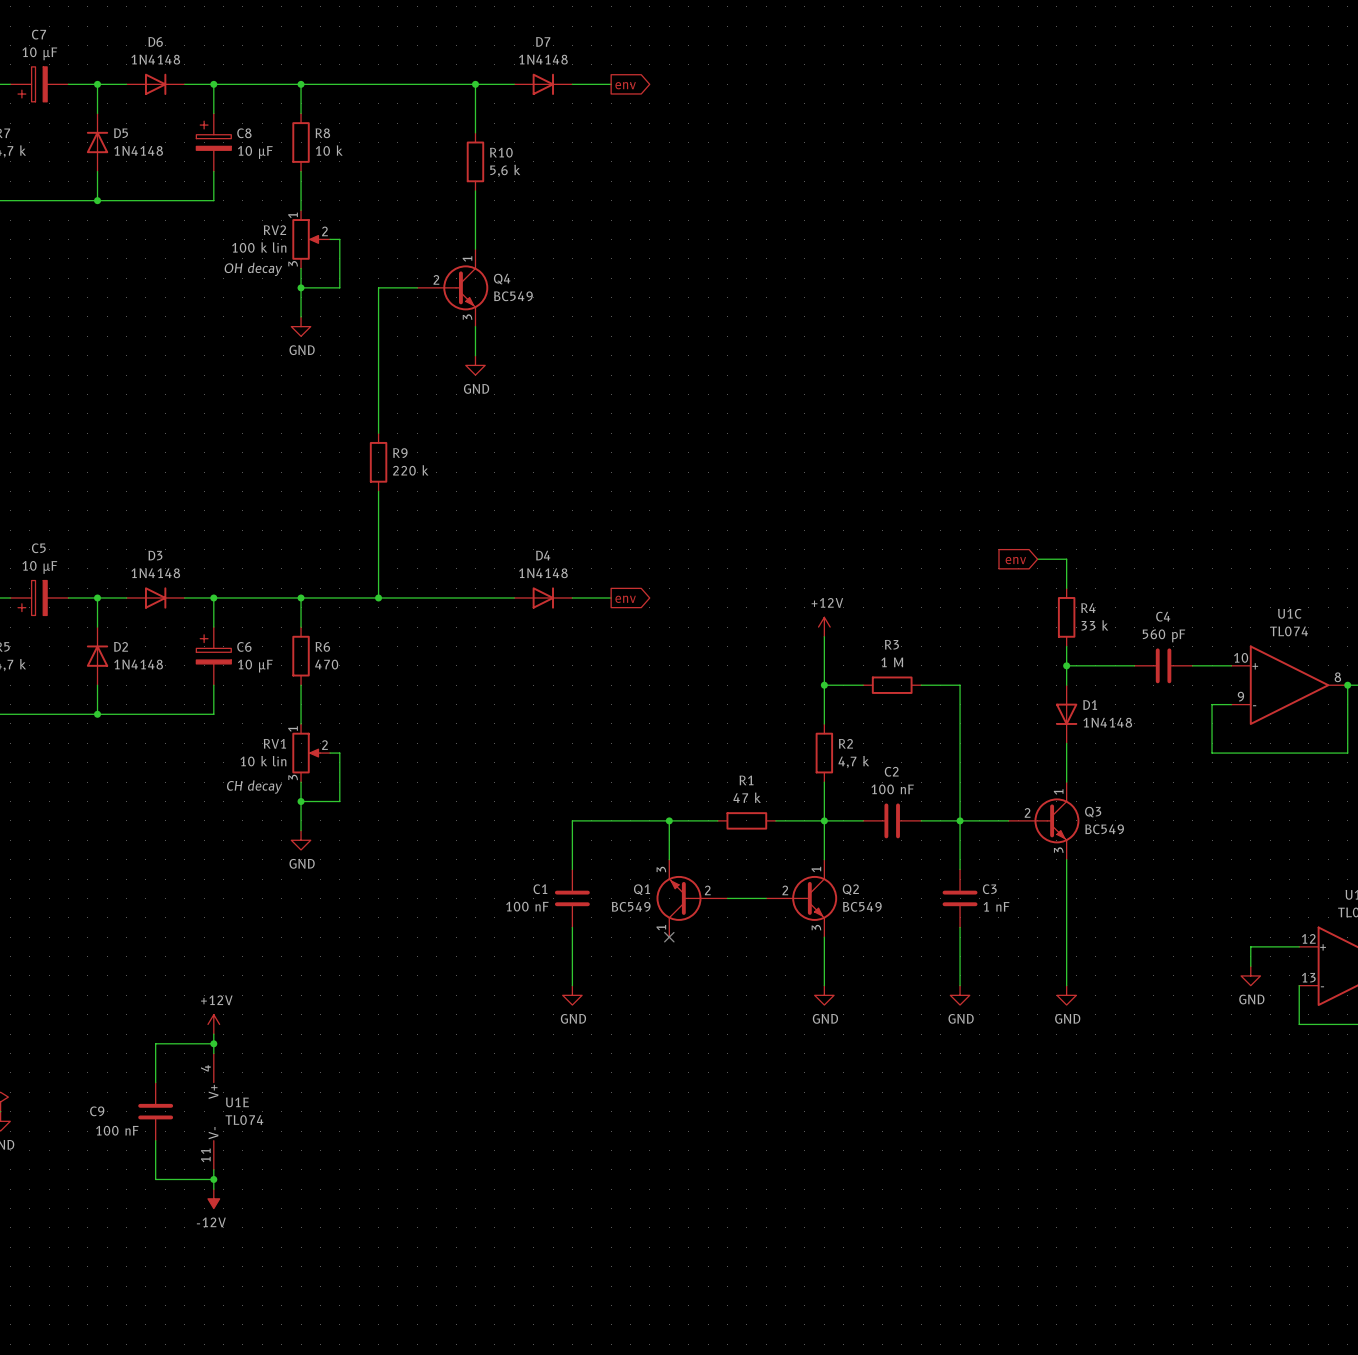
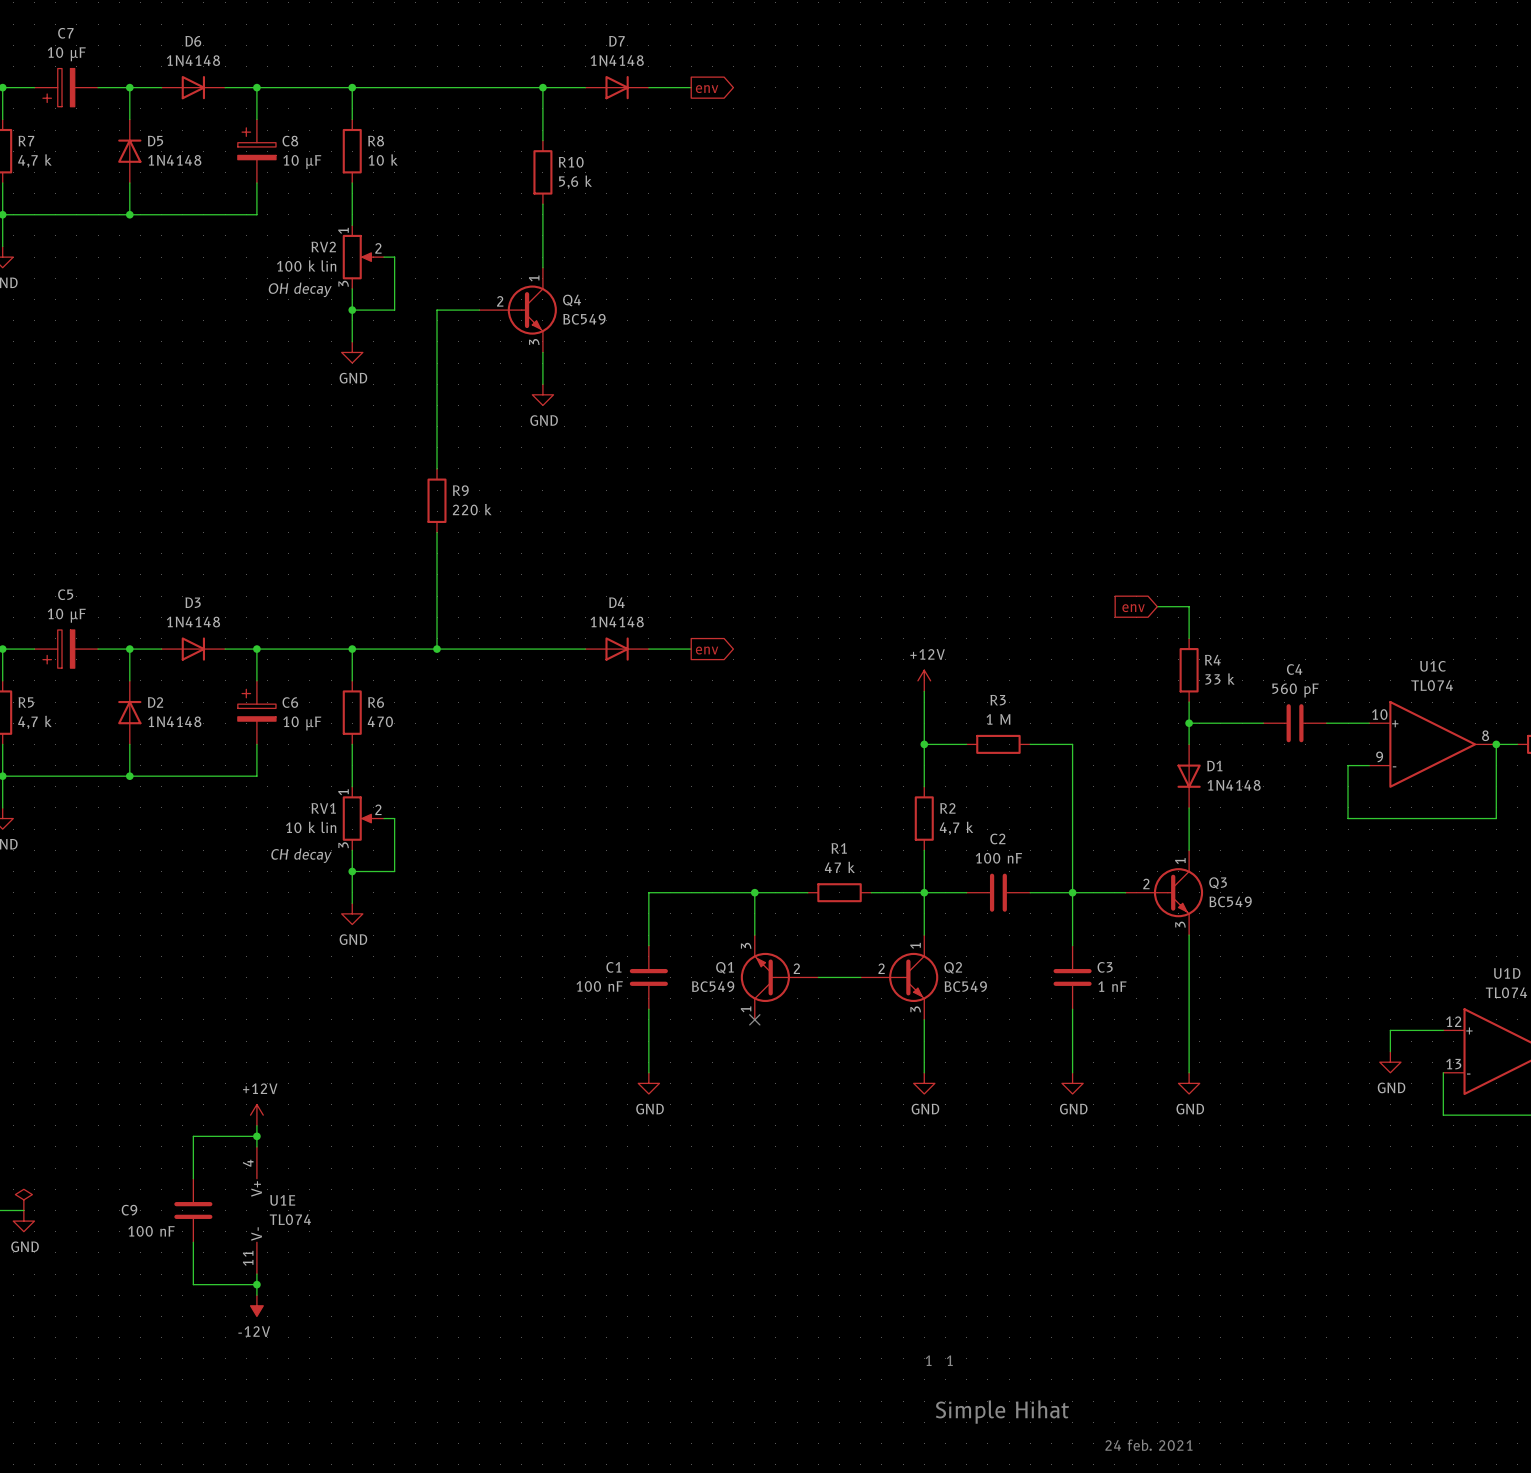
text: none -> 1 (928, 1360)
text: none -> 1 (949, 1360)
text: none -> Simple Hihat (1002, 1412)
text: none -> 24 feb. 2021 (1148, 1445)

